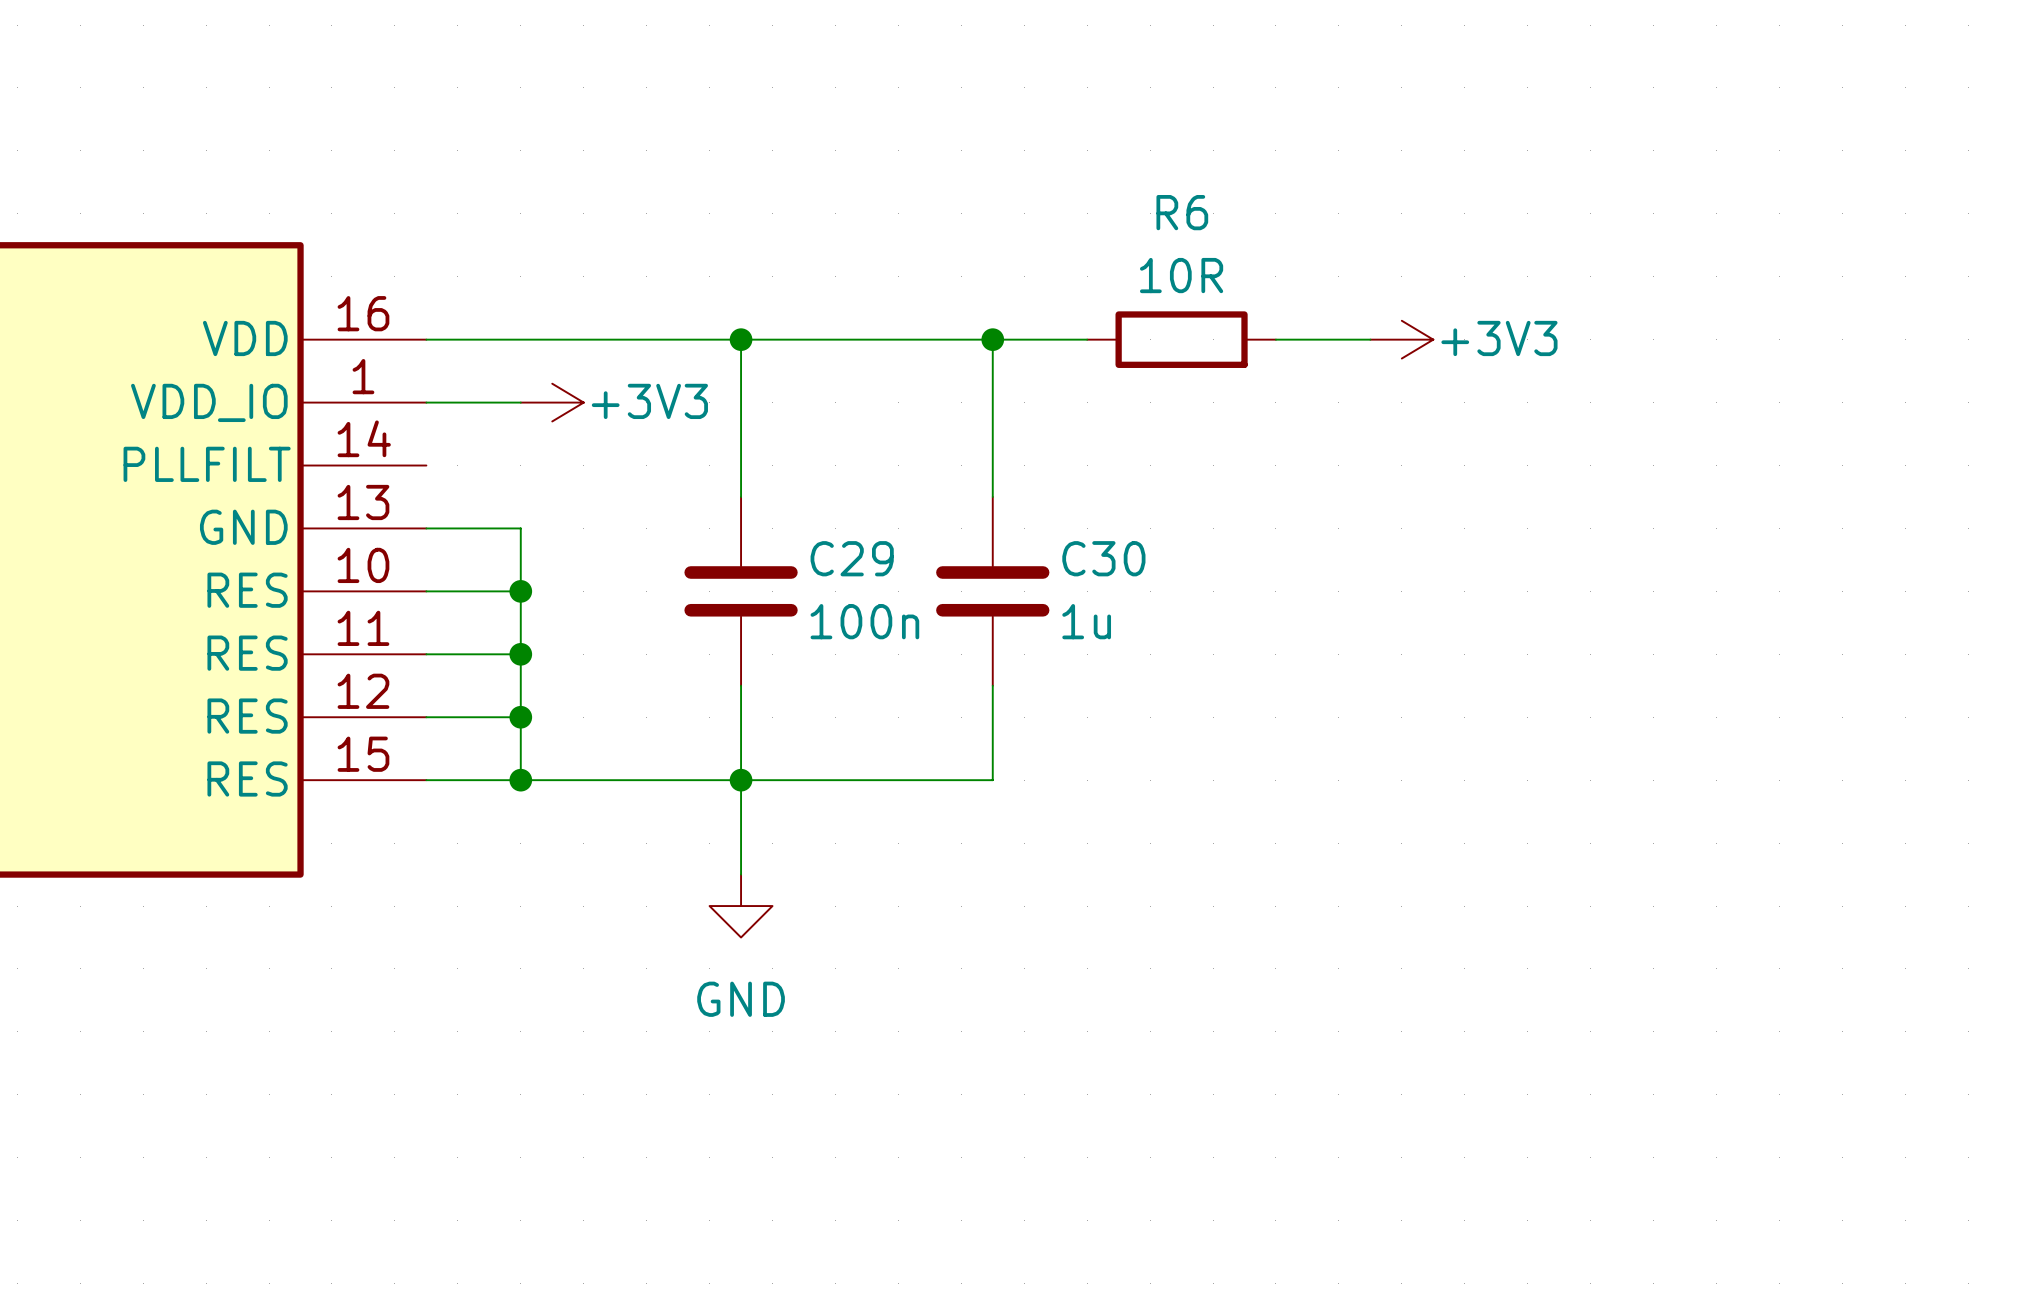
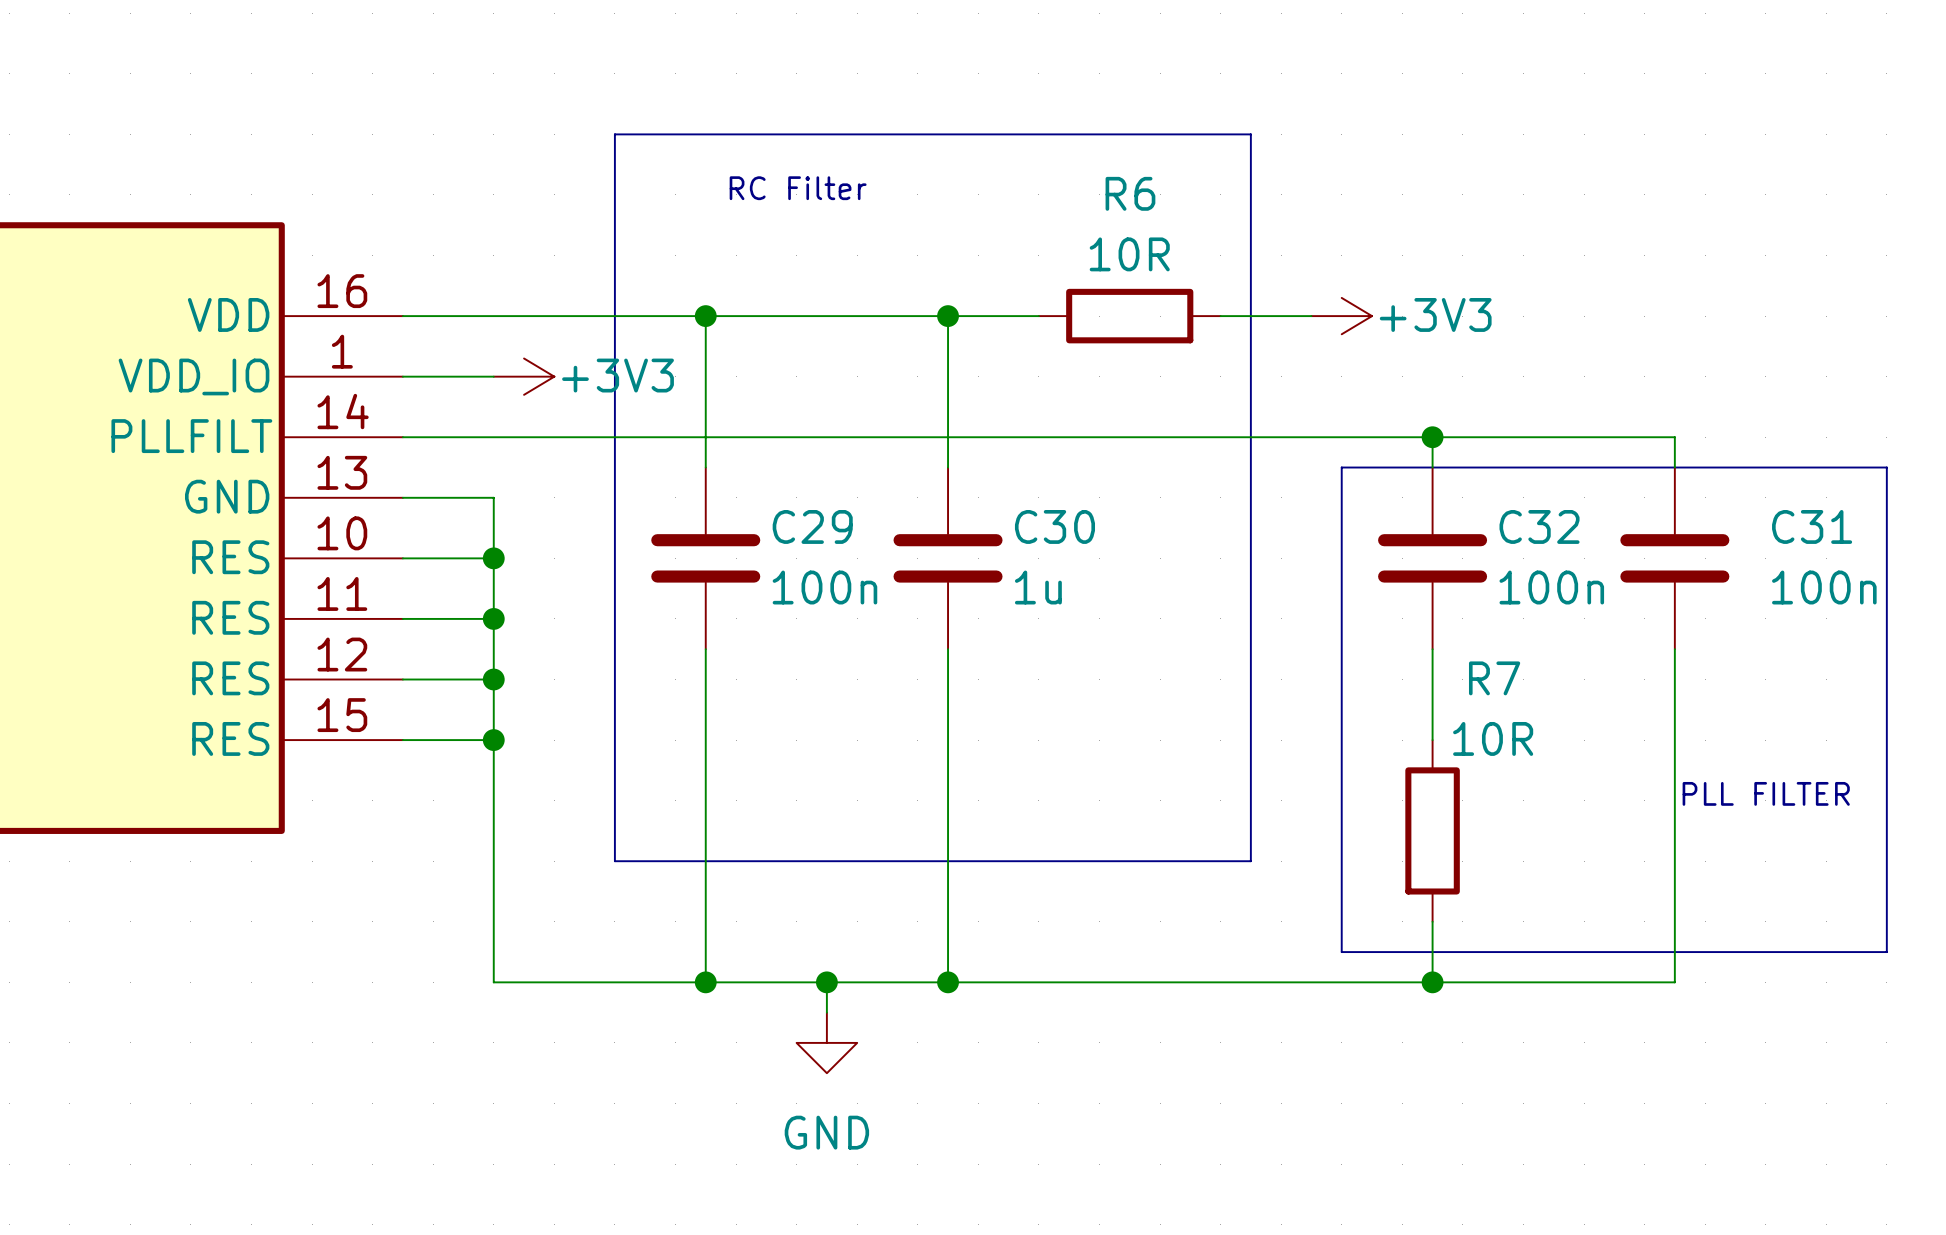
line: none -> (614, 134) (1250, 134) (1250, 861) (614, 861) (614, 134)
text: none -> RC Filter (798, 188)
wire: none -> (402, 437) (1674, 437) (1674, 467)
wire: none -> (1432, 437) (1432, 467)
junction: none -> (1432, 437)
line: none -> (1341, 467) (1886, 467) (1886, 952) (1341, 952) (1341, 467)
C32: none -> 100n (1432, 558)
C31: none -> 100n (1674, 558)
wire: none -> (1432, 649) (1432, 740)
wire: none -> (1674, 649) (1674, 982) (493, 982) (493, 740)
wire: (520, 780) (992, 780) -> (948, 982) (948, 740)
junction: (741, 780) -> none
text: none -> PLL FILTER (1766, 793)
wire: none -> (705, 830) (705, 982)
R7: none -> 10R (1432, 830)
power symbol position: GND (741, 906) -> GND (826, 1042)
wire: none -> (1432, 921) (1432, 982)
junction: none -> (705, 982)
wire: none -> (826, 982) (826, 1012)
junction: none -> (826, 982)
junction: none -> (948, 982)
junction: none -> (1432, 982)

